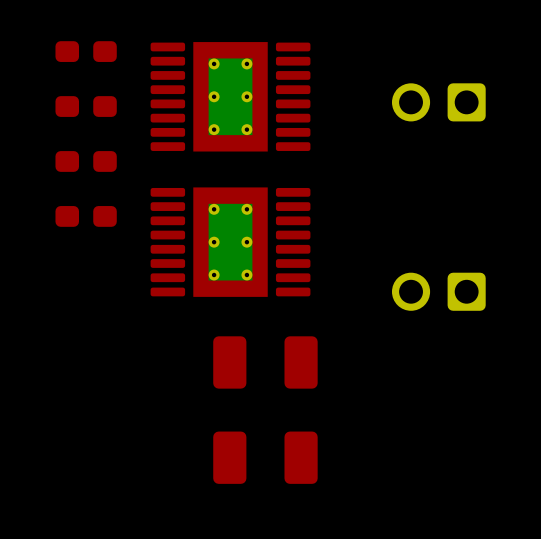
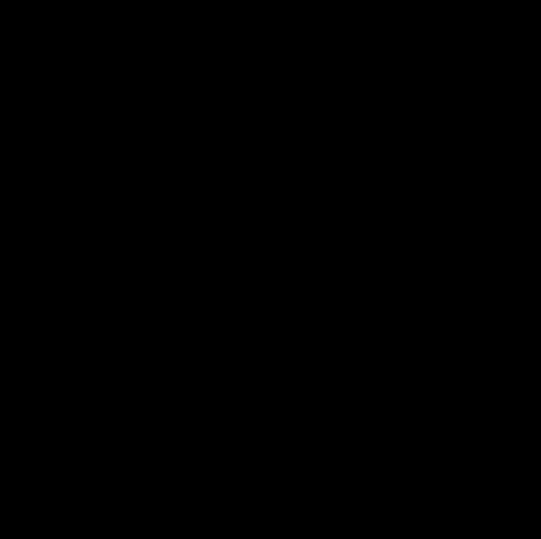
part: (86, 51) -> none
part: (230, 96) -> none
part: (438, 102) -> none
part: (86, 106) -> none
part: (86, 161) -> none
part: (86, 216) -> none
part: (230, 242) -> none
part: (438, 291) -> none
part: (265, 362) -> none
part: (265, 457) -> none

